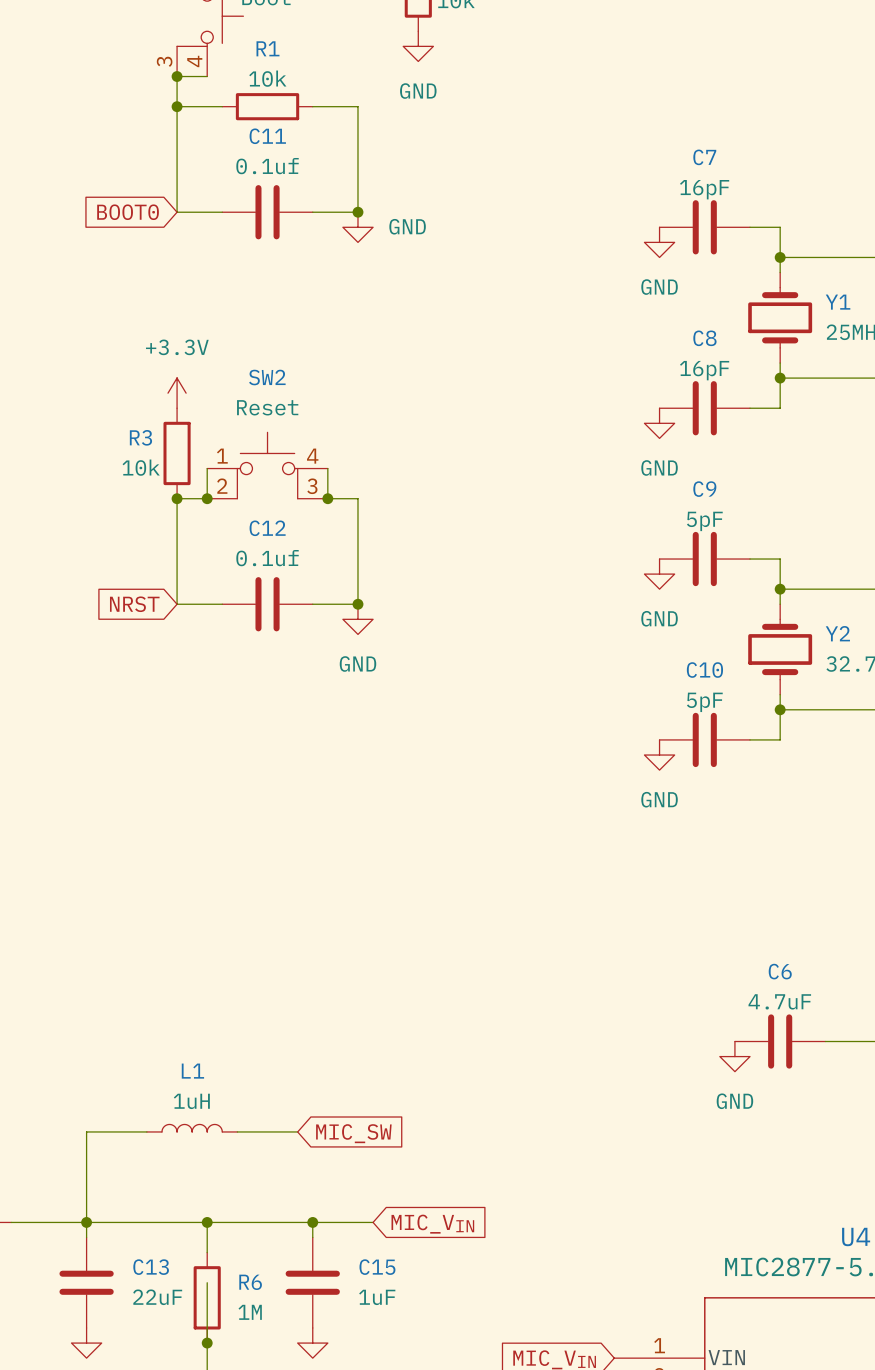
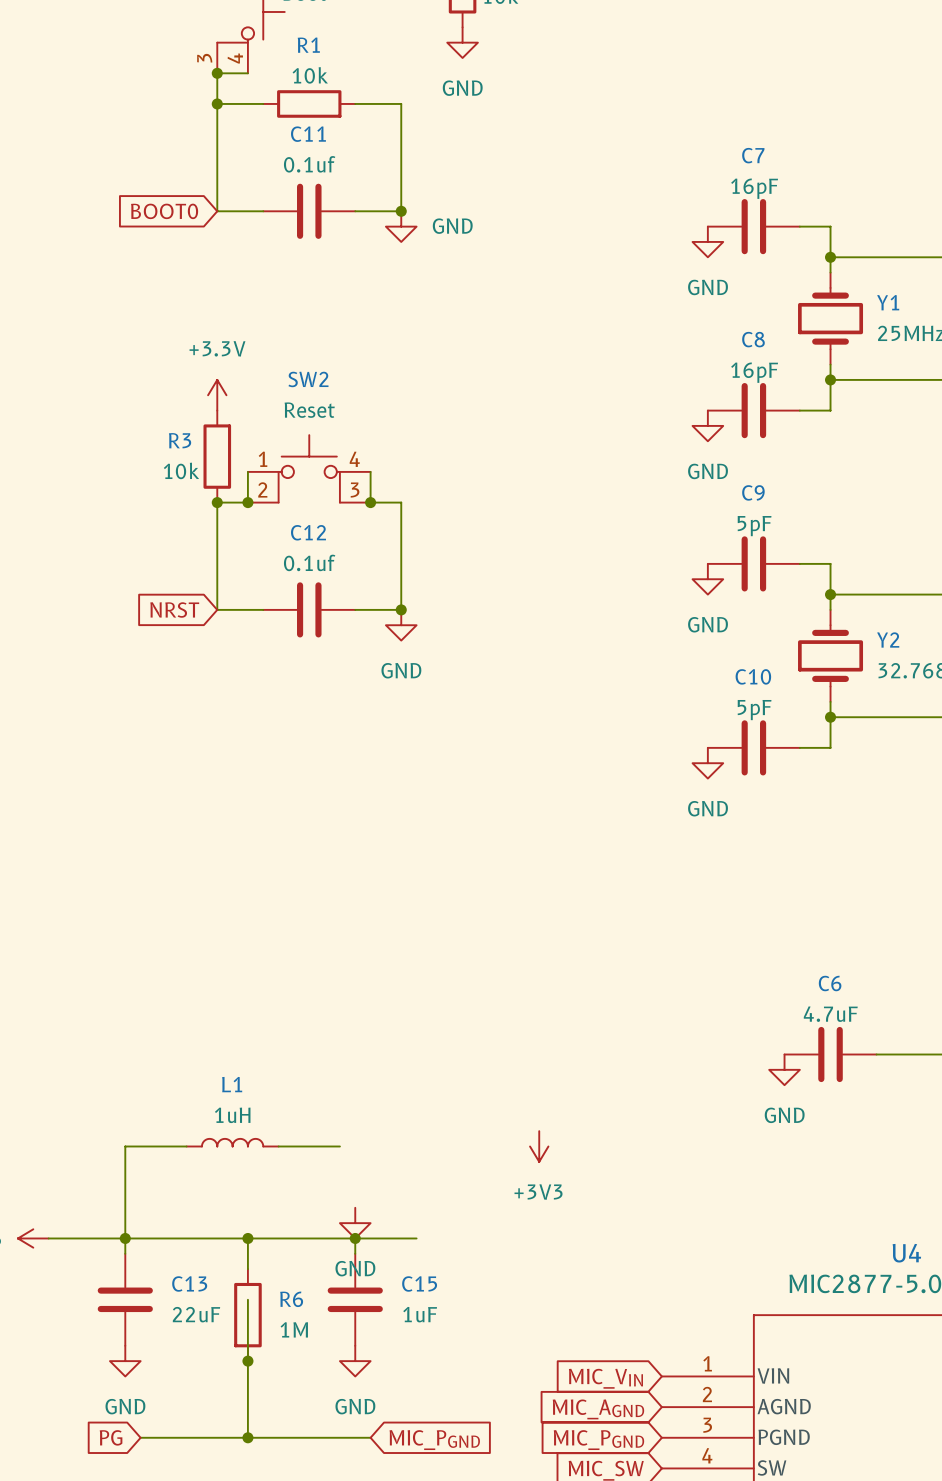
power symbol: none -> +3V3 (539, 1146)
global label: MIC_SW (353, 1133) -> none
power symbol: none -> GND (355, 1223)
global label: MIC_VIN (432, 1224) -> none

